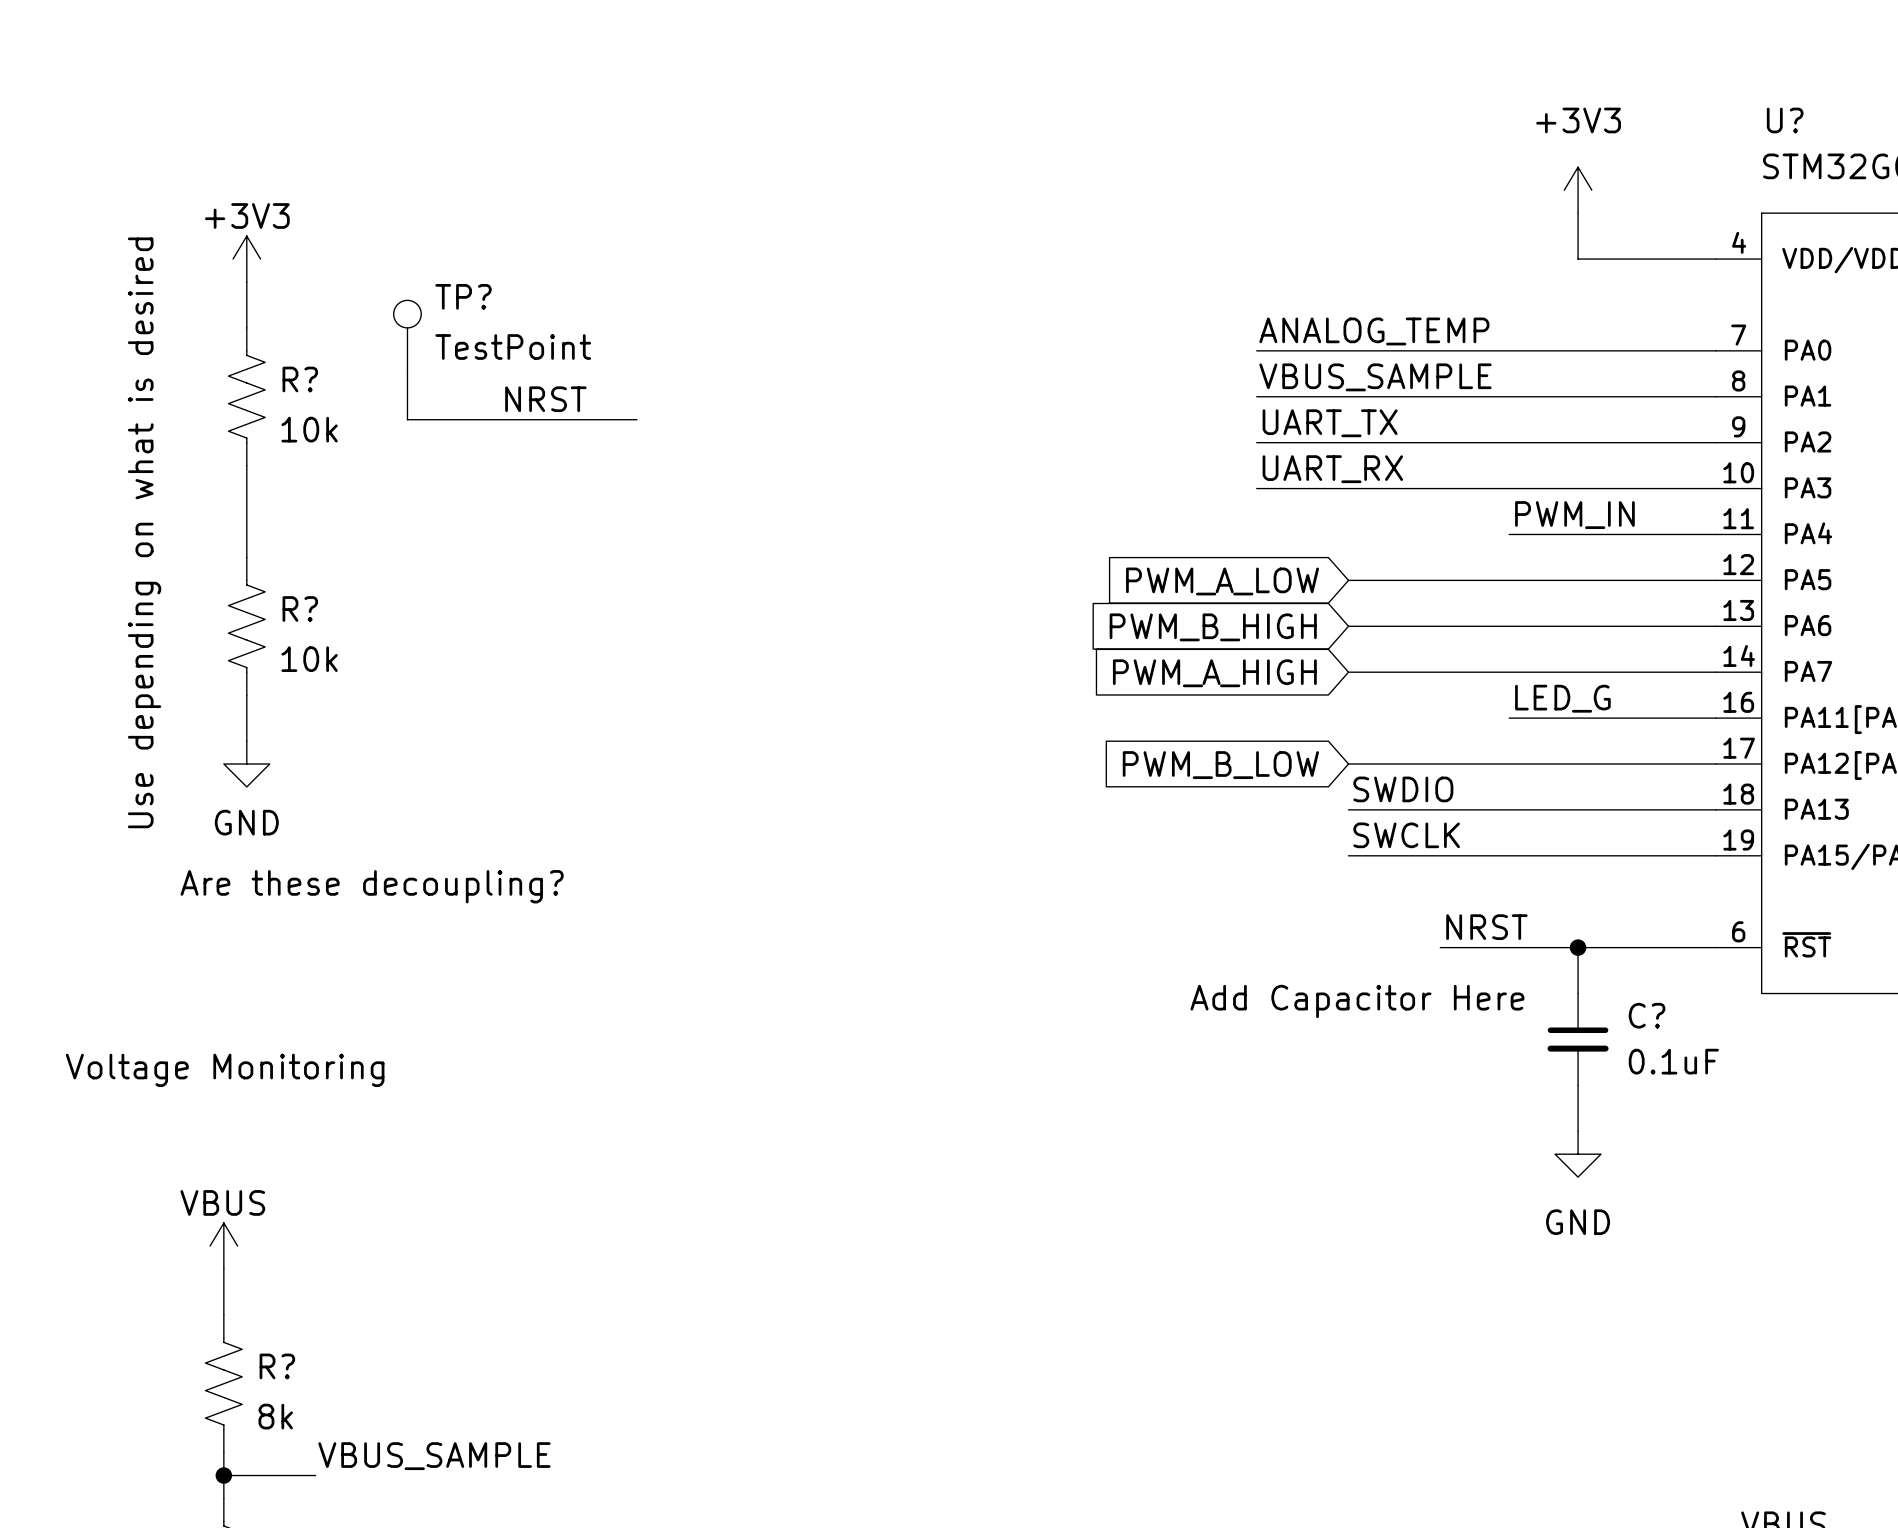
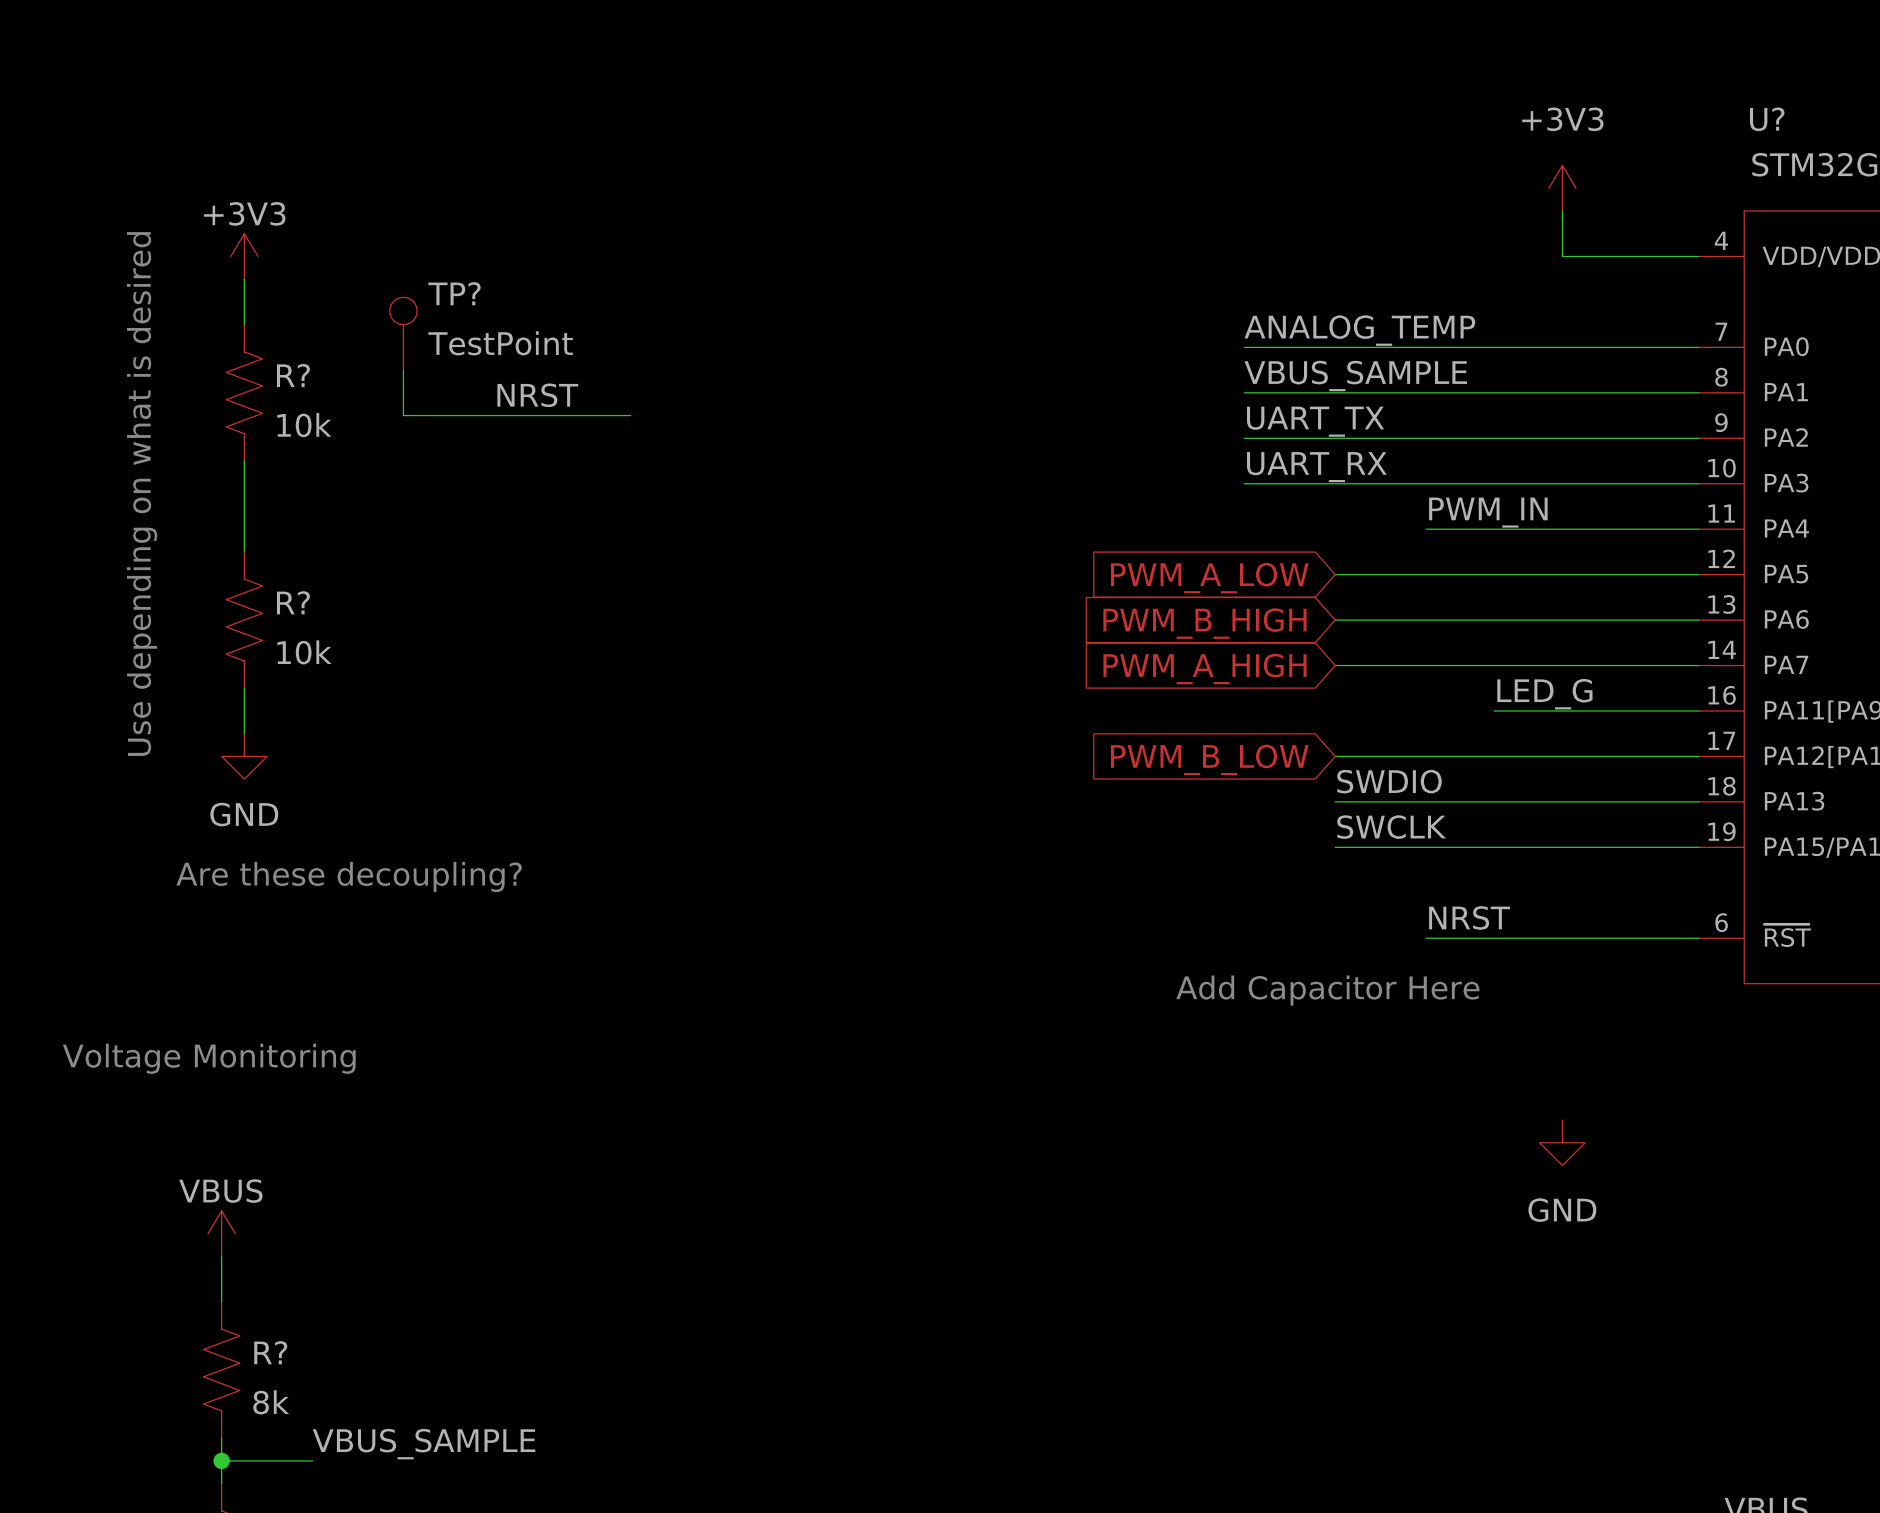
label position: PWM_IN (1574, 515) -> PWM_IN (1488, 512)
wire: none -> (1426, 529) (1494, 529)
wire: (1578, 947) (1578, 993) -> none
junction: (1578, 947) -> none
C?: 0.1uF (1578, 1039) -> none
wire: (1578, 1085) (1578, 1131) -> none

